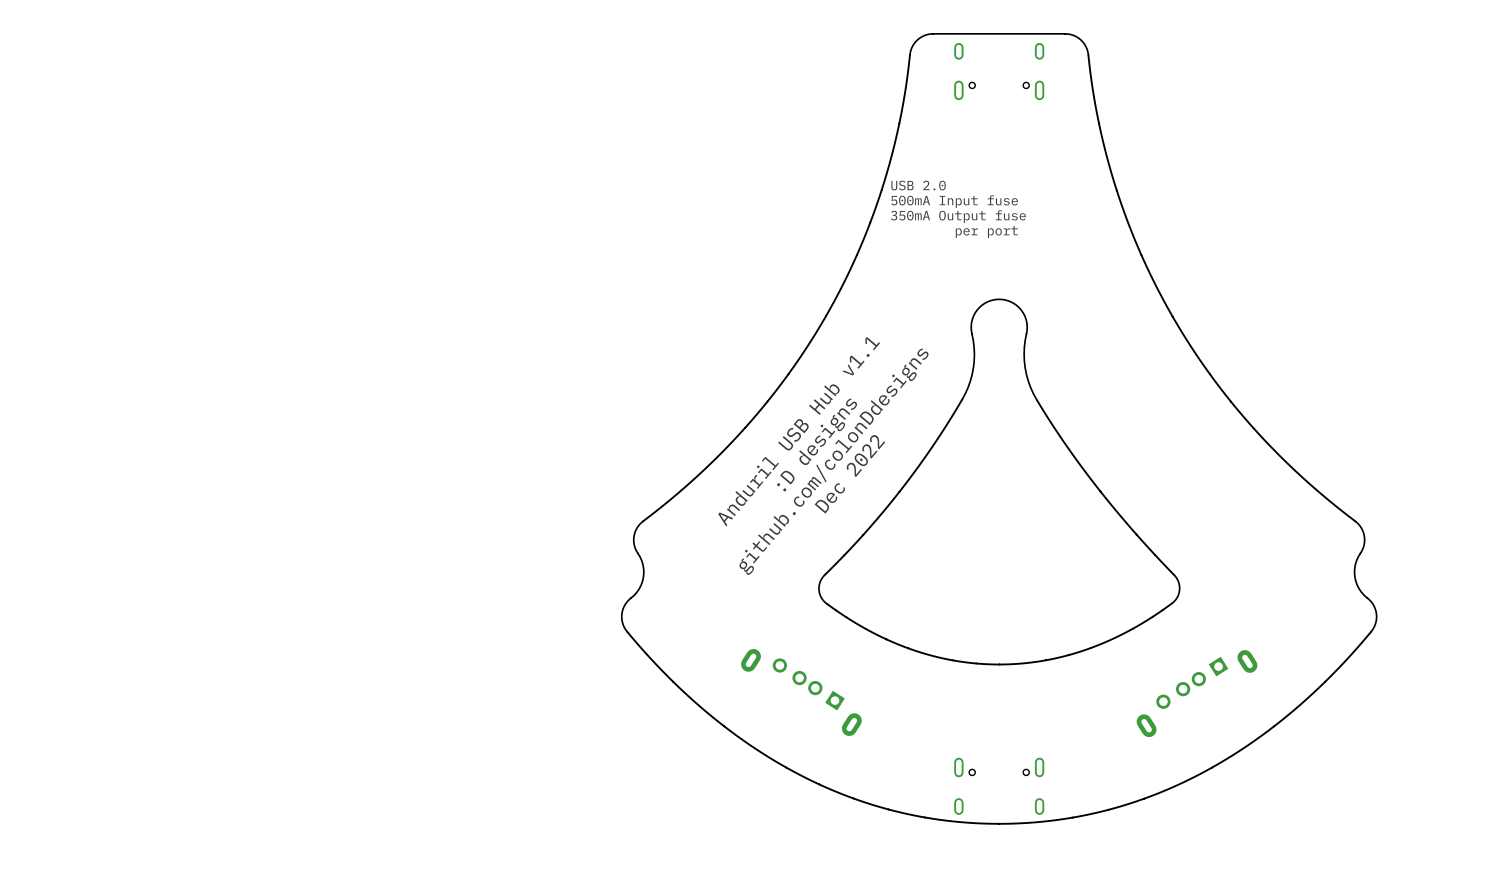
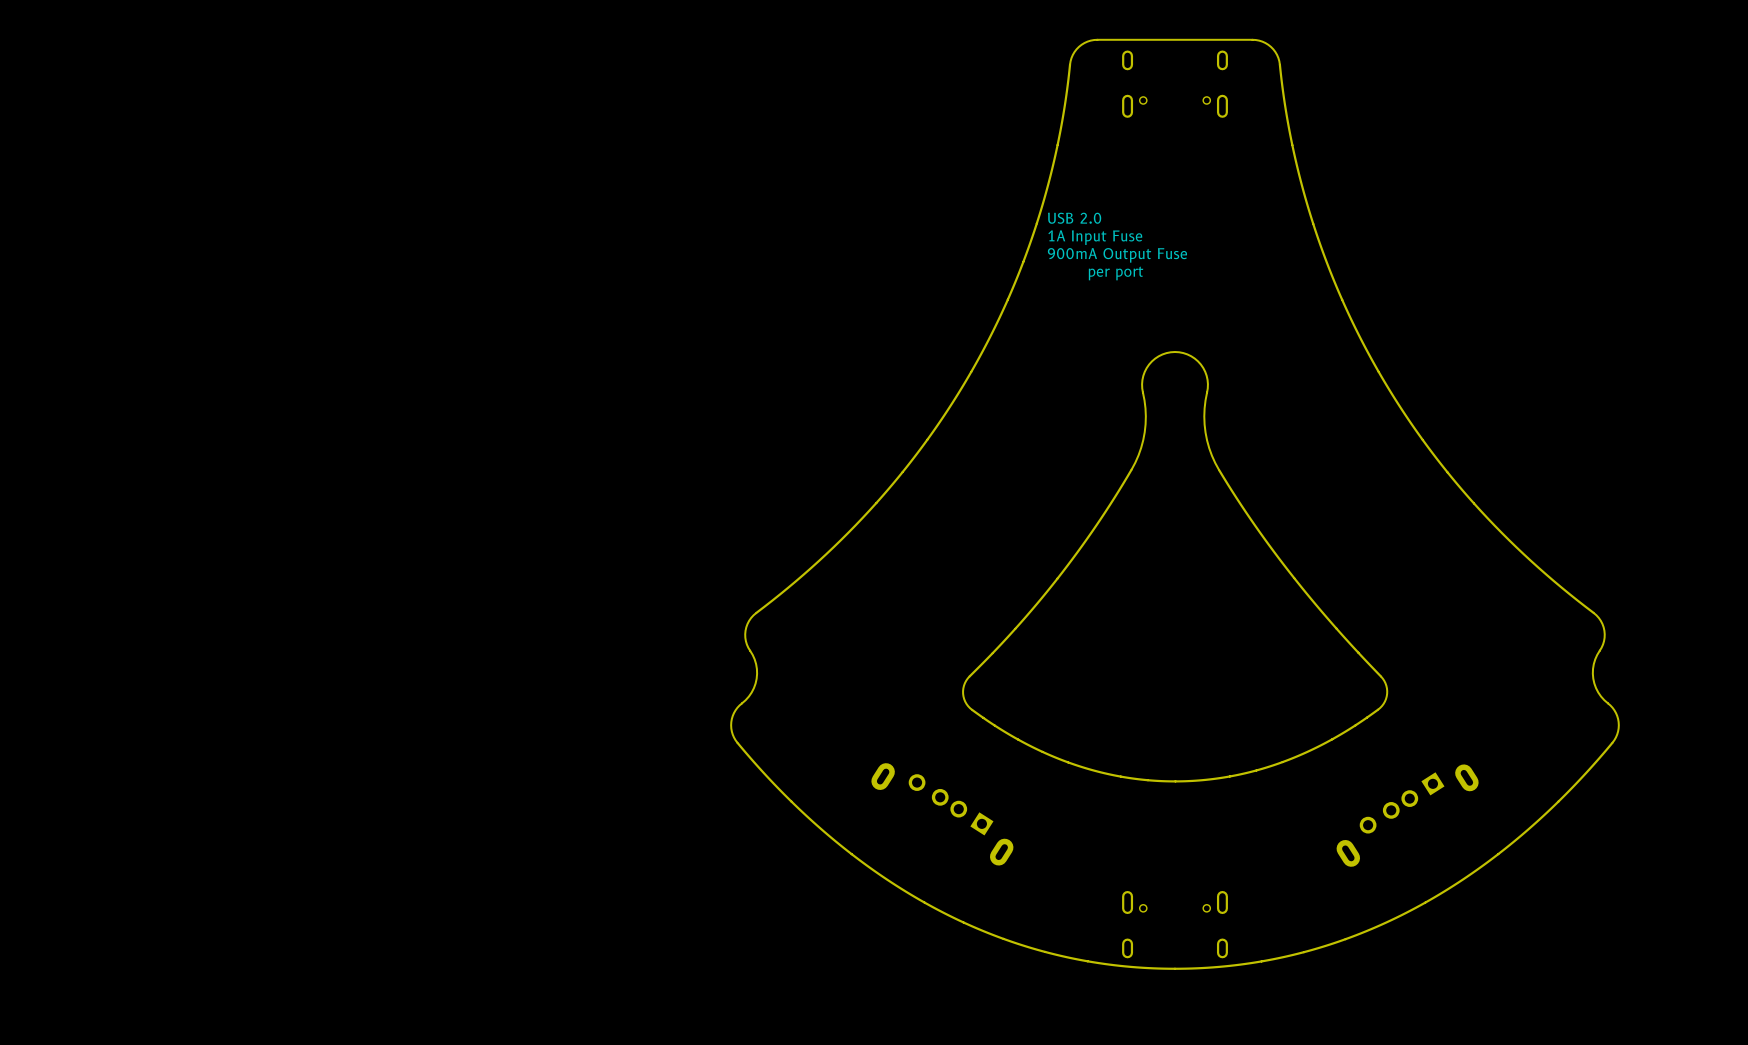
text: 500mA Input fuse (954, 201) -> 1A Input Fuse (1095, 237)
text: 350mA Output fuse (958, 216) -> 900mA Output Fuse (1117, 255)
text: Anduril USB Hub v1.1 (799, 431) -> none
text: :D designs (817, 445) -> none
text: github.com/colonDdesigns (834, 461) -> none
text: Dec 2022 (849, 474) -> none

